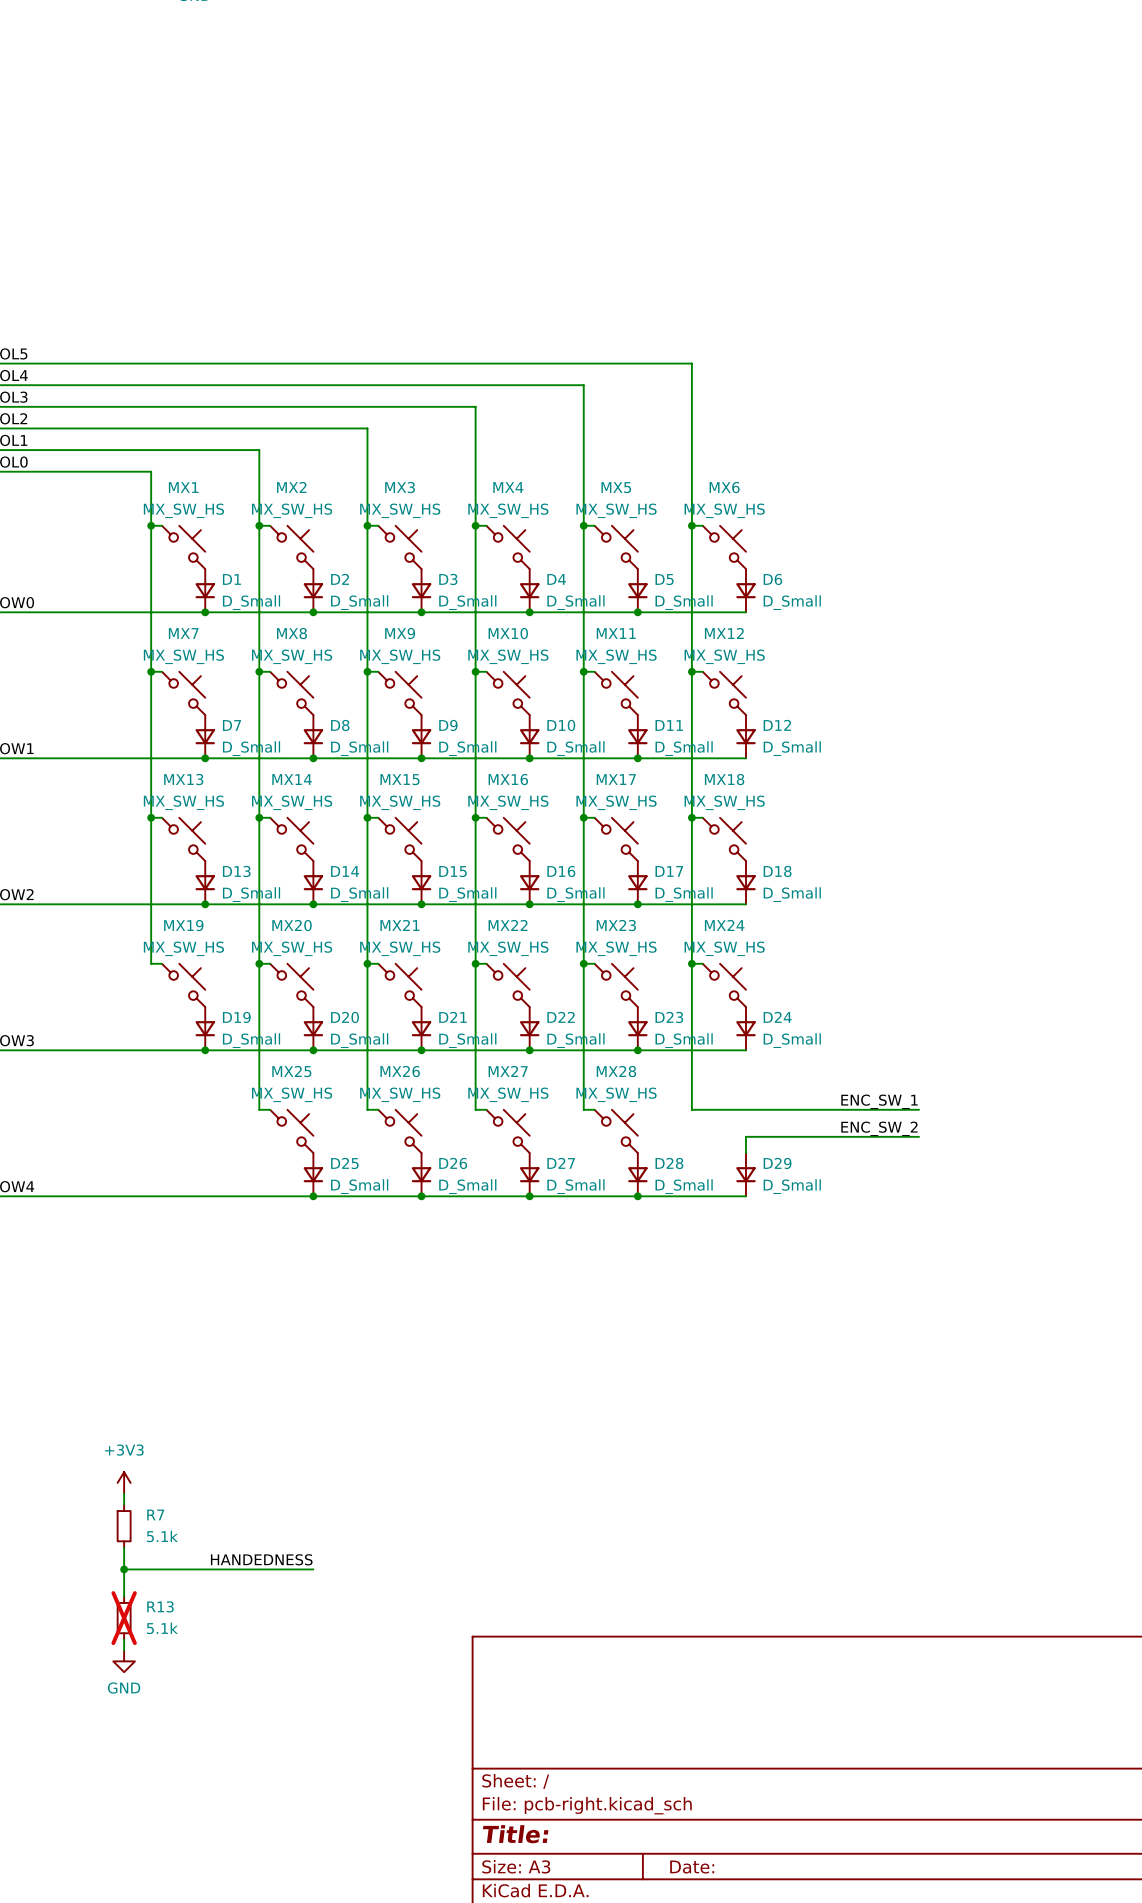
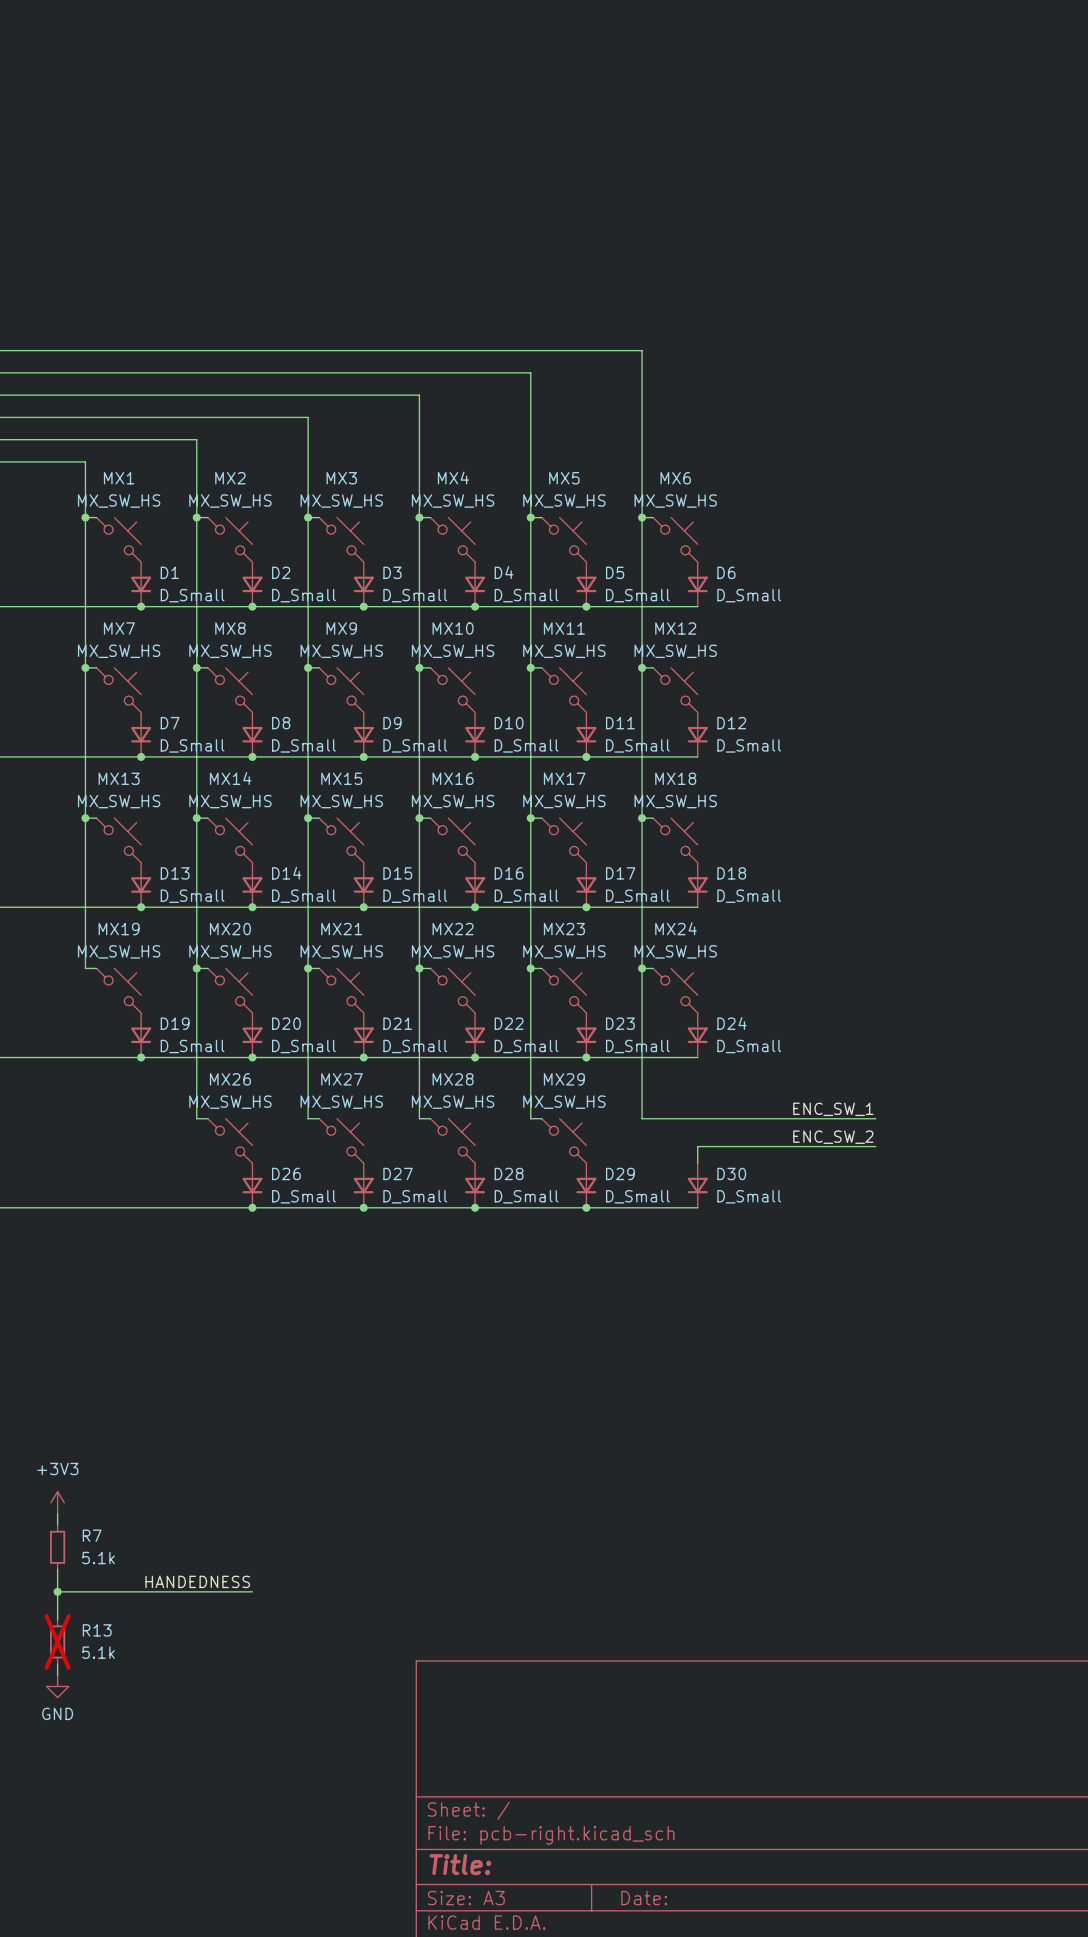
MX25 name: MX25 (291, 1071) -> MX26 (230, 1079)
MX26 name: MX26 (400, 1071) -> MX27 (342, 1079)
MX27 name: MX27 (508, 1071) -> MX28 (453, 1079)
MX28 name: MX28 (616, 1071) -> MX29 (564, 1079)
D25 name: D25 (344, 1163) -> D26 (286, 1173)
D26 name: D26 (453, 1163) -> D27 (398, 1173)
D27 name: D27 (561, 1163) -> D28 (509, 1173)
D28 name: D28 (669, 1163) -> D29 (620, 1173)
D29 name: D29 (777, 1163) -> D30 (731, 1173)

